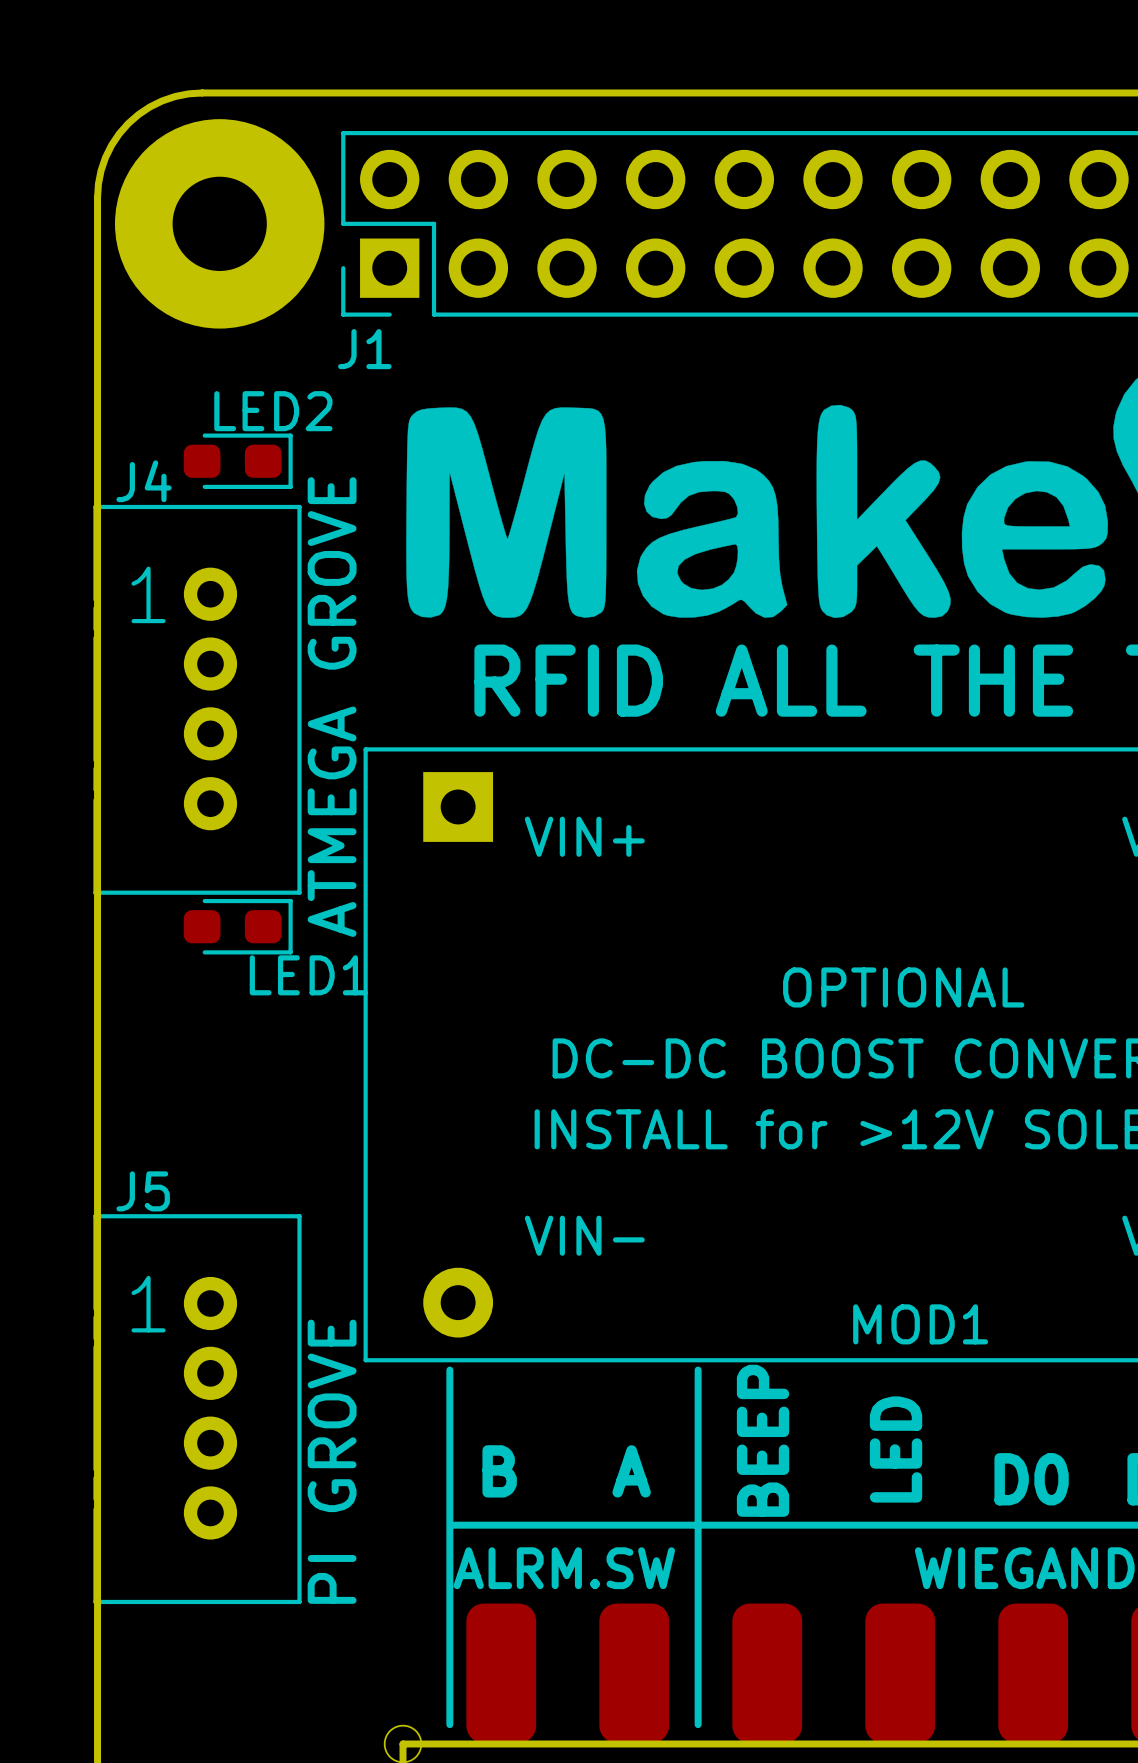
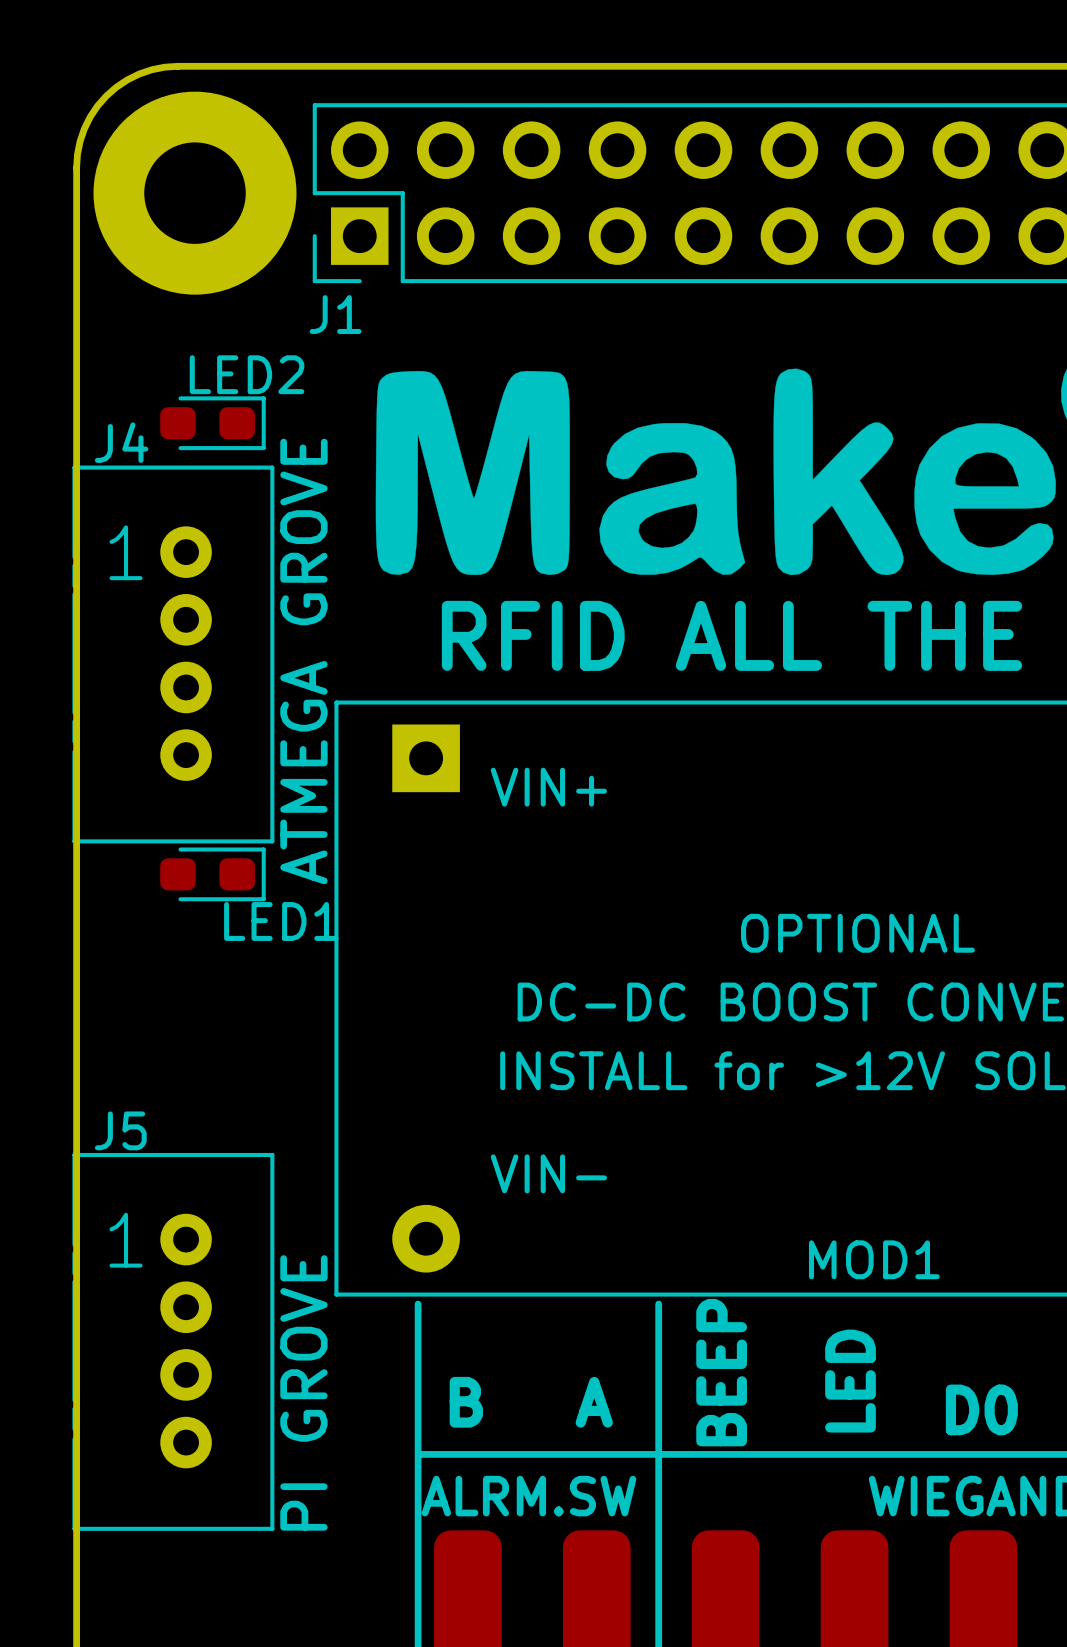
part footprint: [114, 119, 325, 329] -> [93, 91, 297, 295]

